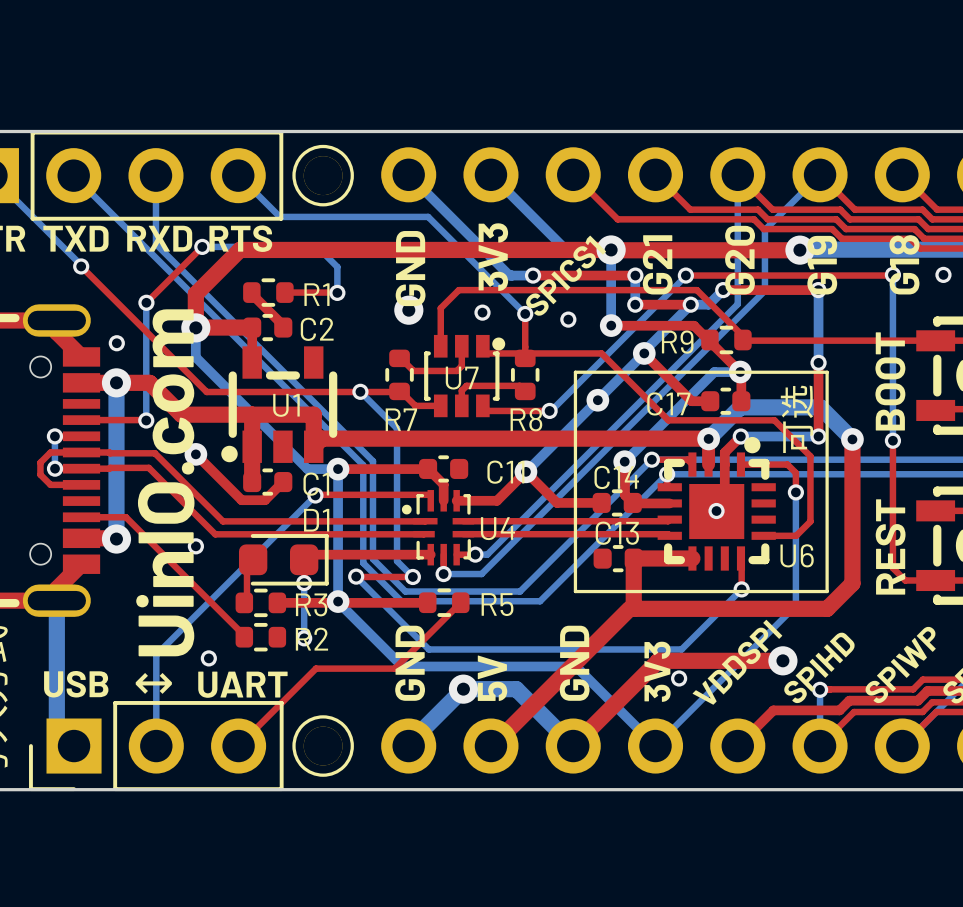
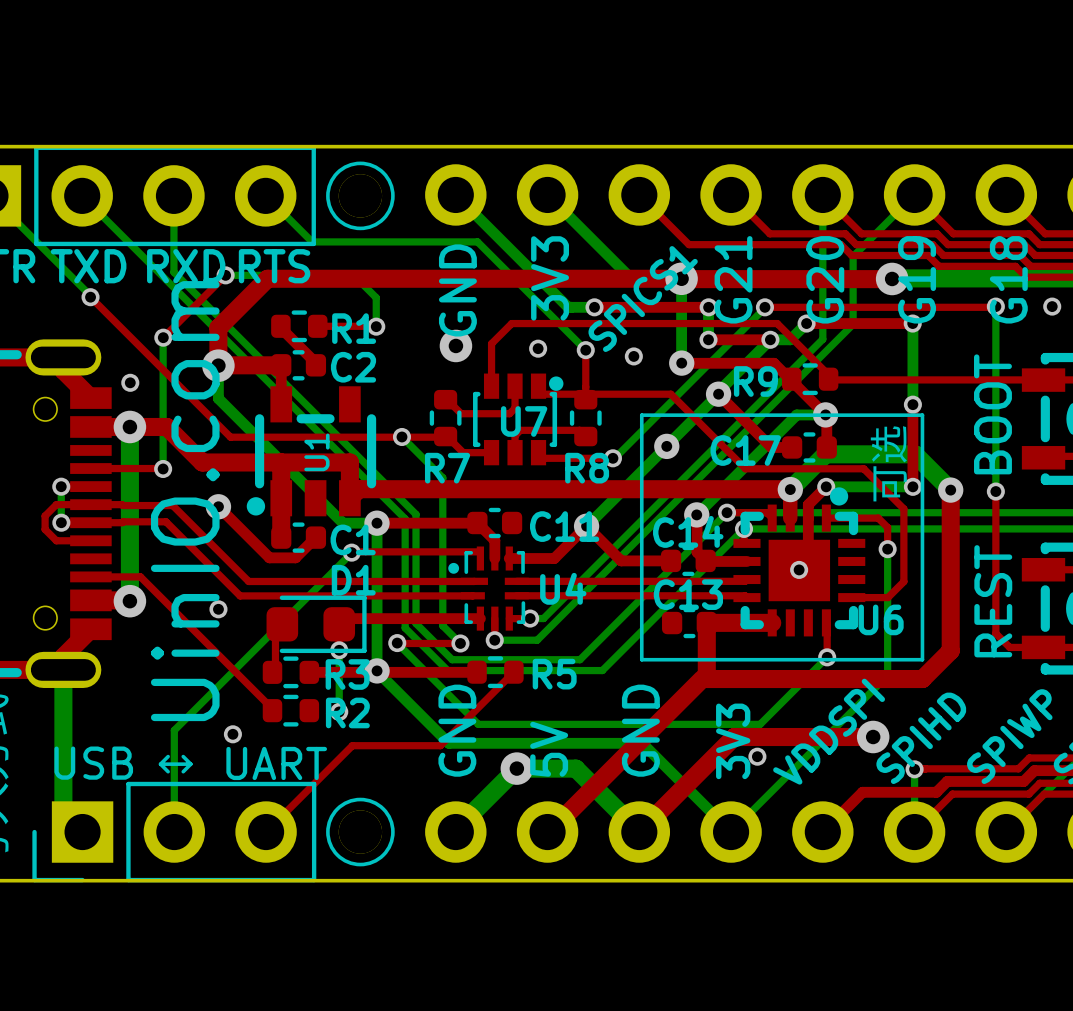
U1 name rotation: 0° (286, 405) -> 90° counterclockwise (316, 452)

